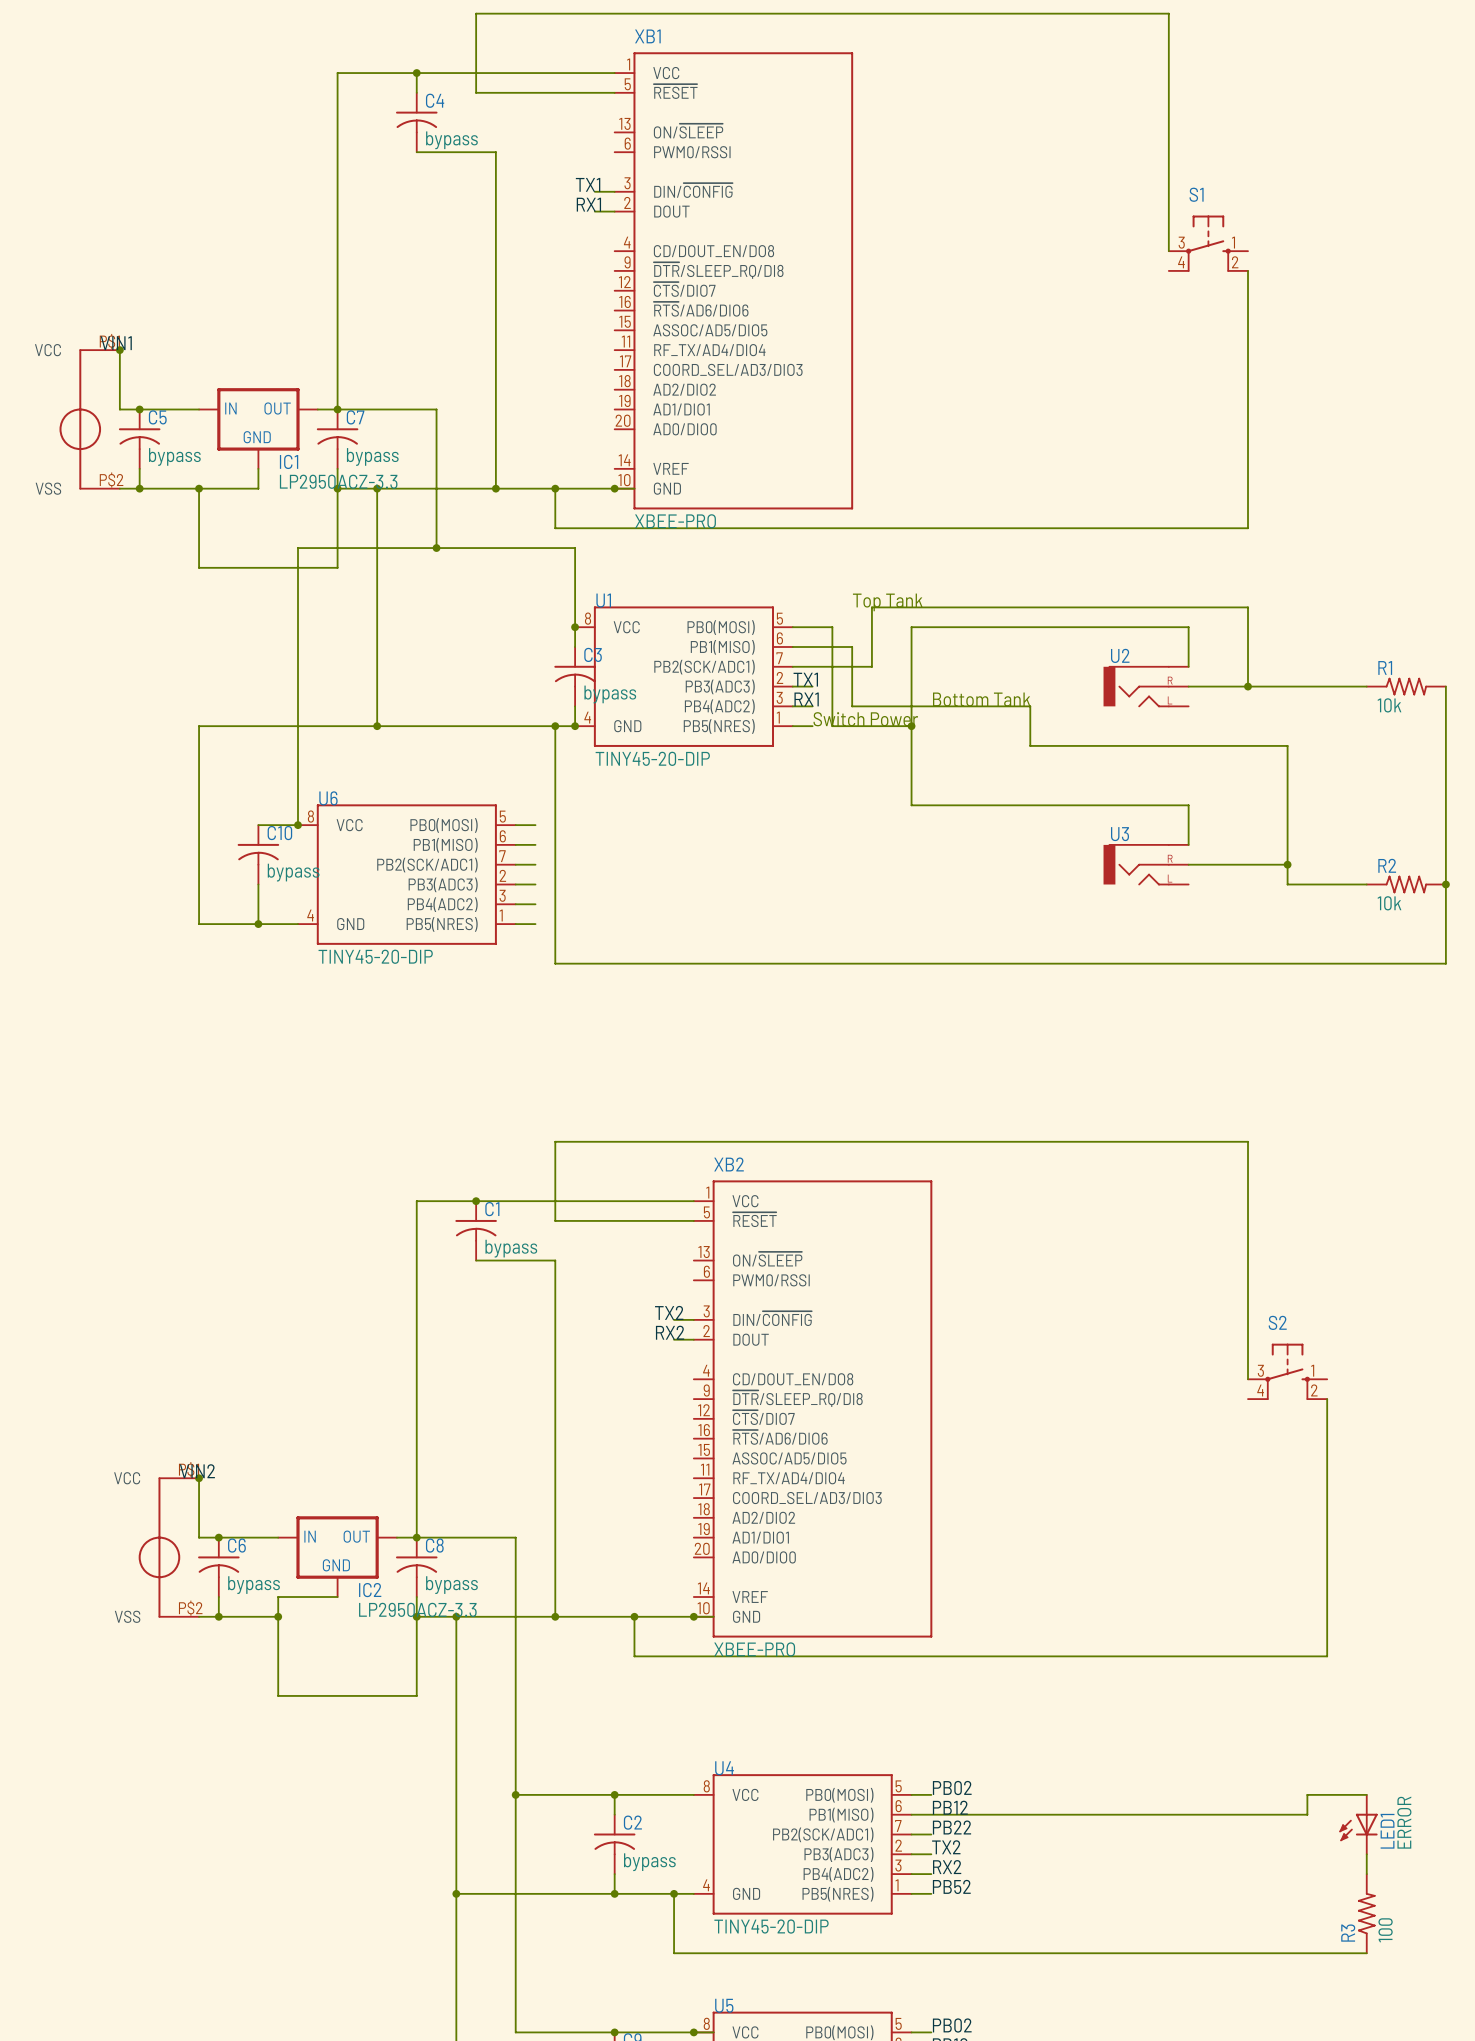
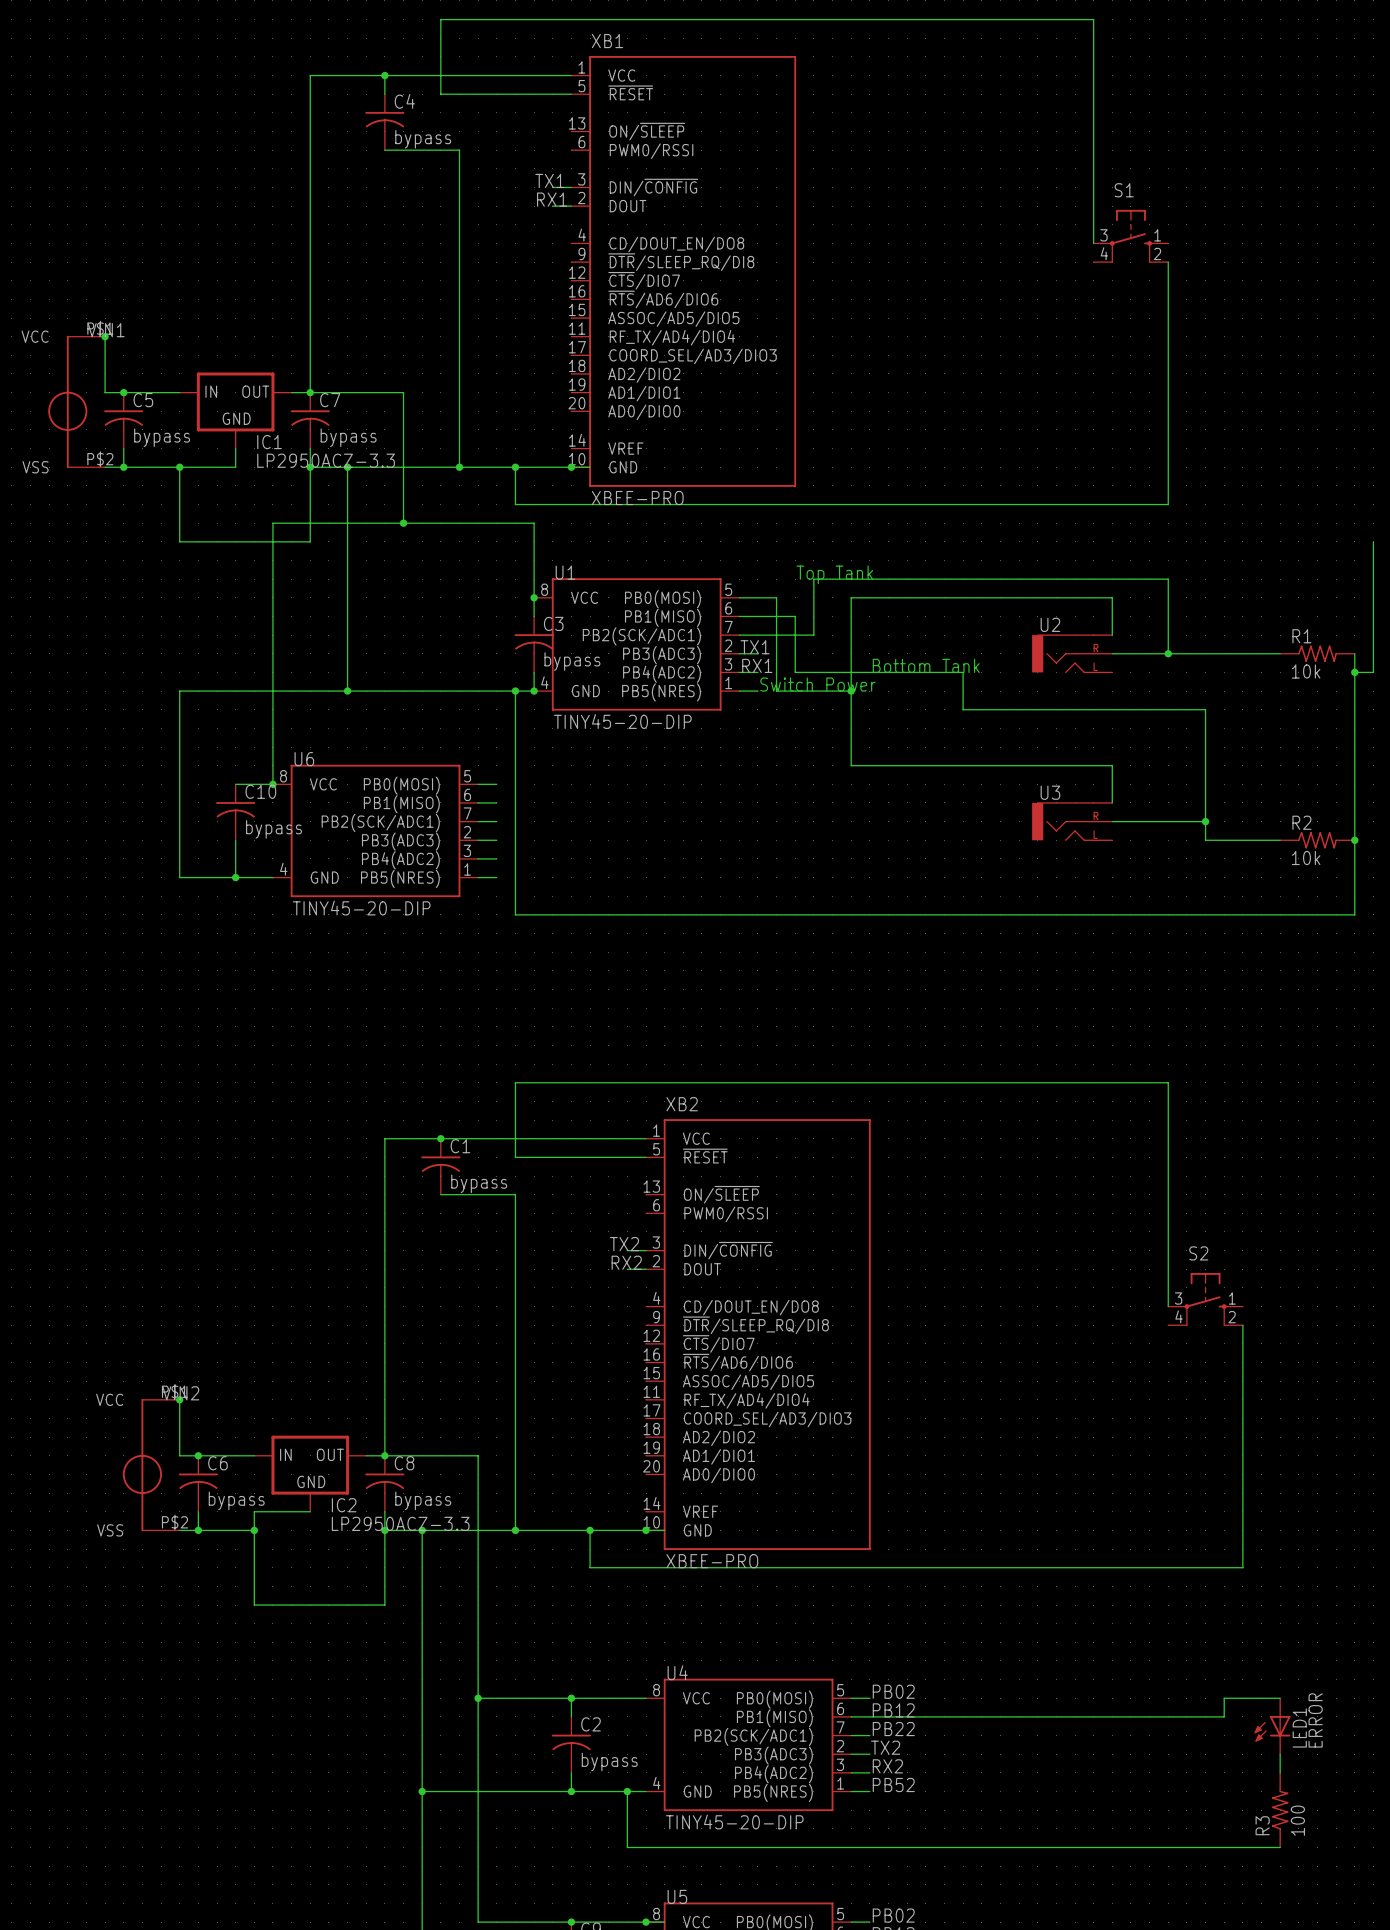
wire: none -> (1373, 541) (1373, 672) (1354, 672)
junction: none -> (1354, 672)

